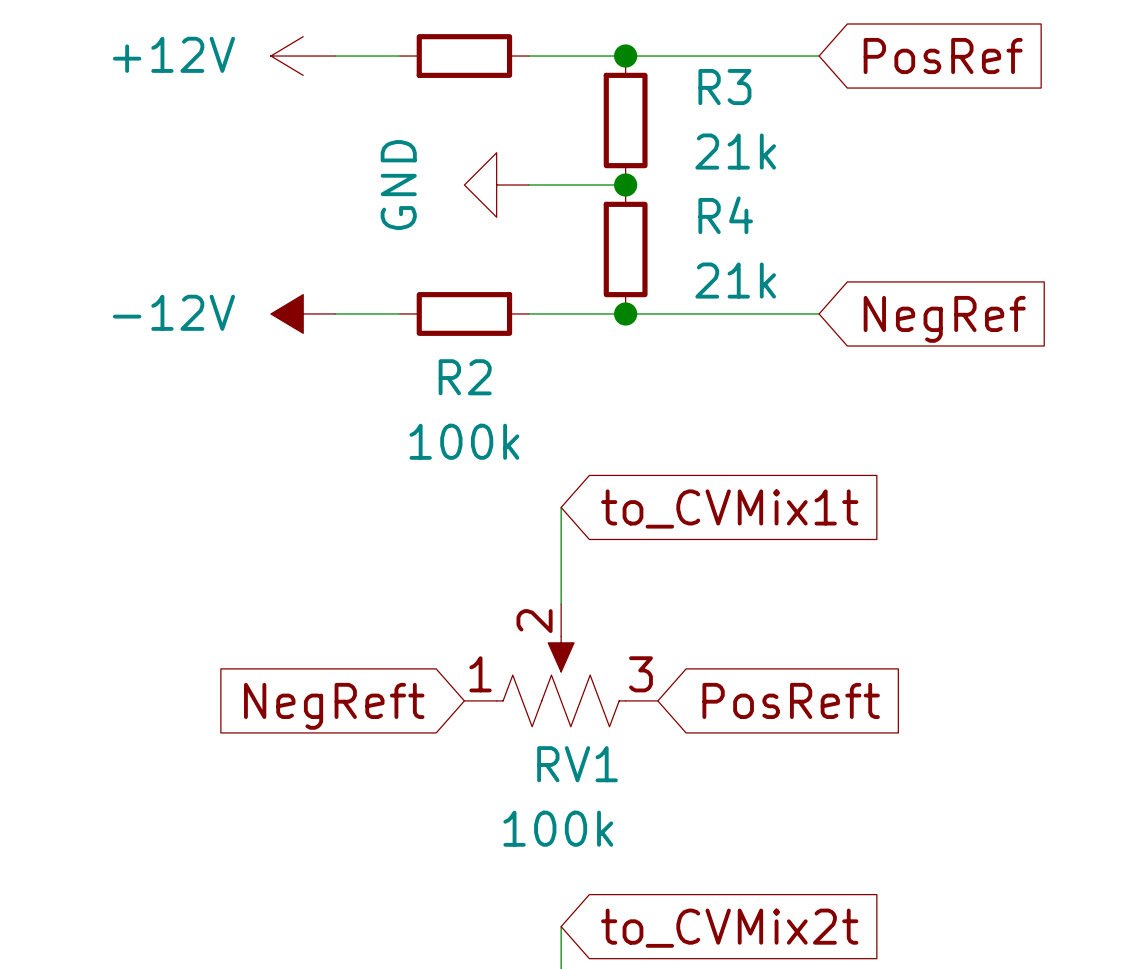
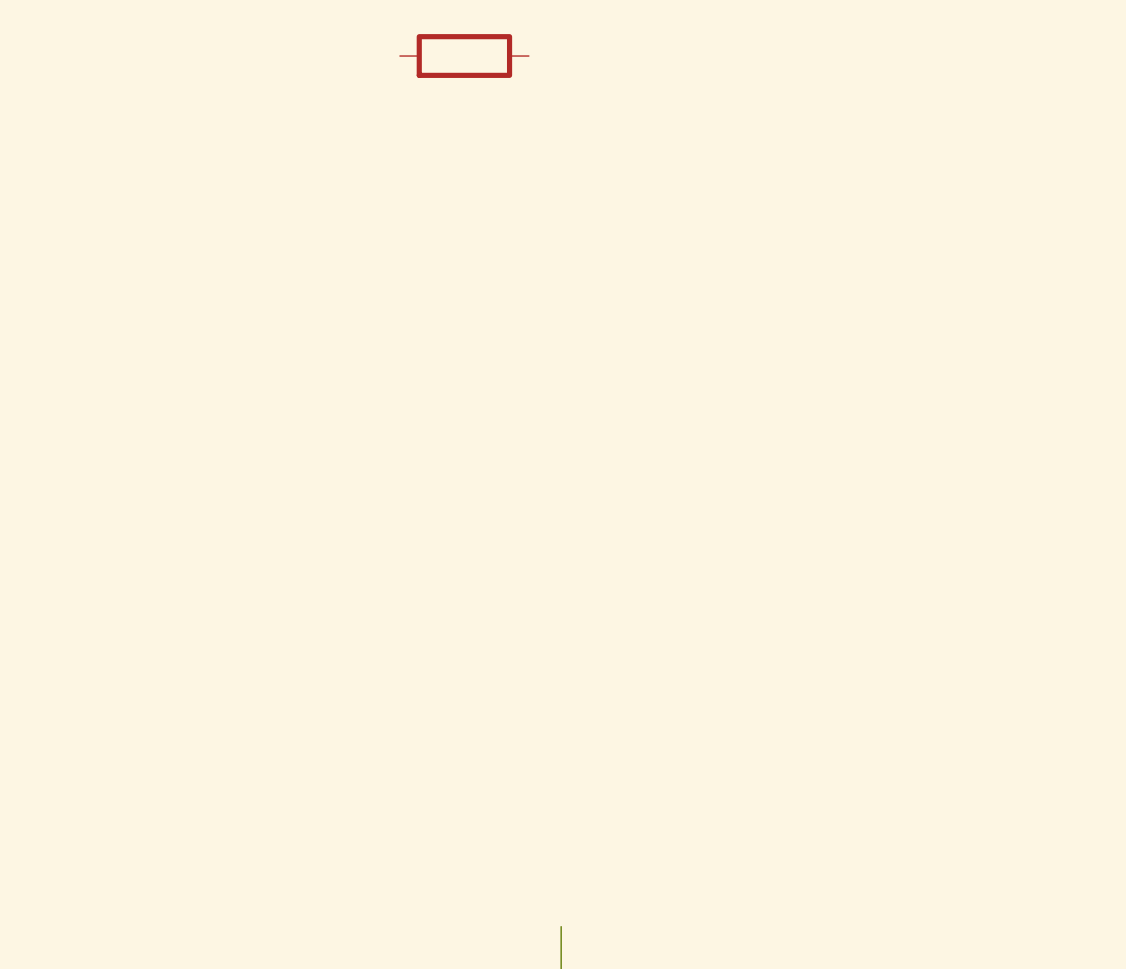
power symbol: +12V (303, 56) -> none
wire: (335, 56) (399, 56) -> none
wire: (528, 56) (819, 56) -> none
junction: (625, 56) -> none
global label: PosRef (943, 56) -> none
R3: 21k (625, 120) -> none
power symbol: GND (496, 185) -> none
wire: (528, 185) (625, 185) -> none
junction: (625, 185) -> none
R4: 21k (625, 249) -> none
power symbol: -12V (303, 313) -> none
wire: (335, 313) (399, 313) -> none
R2: 100k (464, 313) -> none
wire: (528, 313) (819, 313) -> none
junction: (625, 313) -> none
global label: NegRef (944, 319) -> none
wire: (561, 507) (561, 604) -> none
global label: to_CVMix1t (729, 508) -> none
RV1: 100k (561, 665) -> none
global label: PosReft (791, 700) -> none
global label: NegReft (334, 706) -> none
global label: to_CVMix2t (729, 928) -> none

